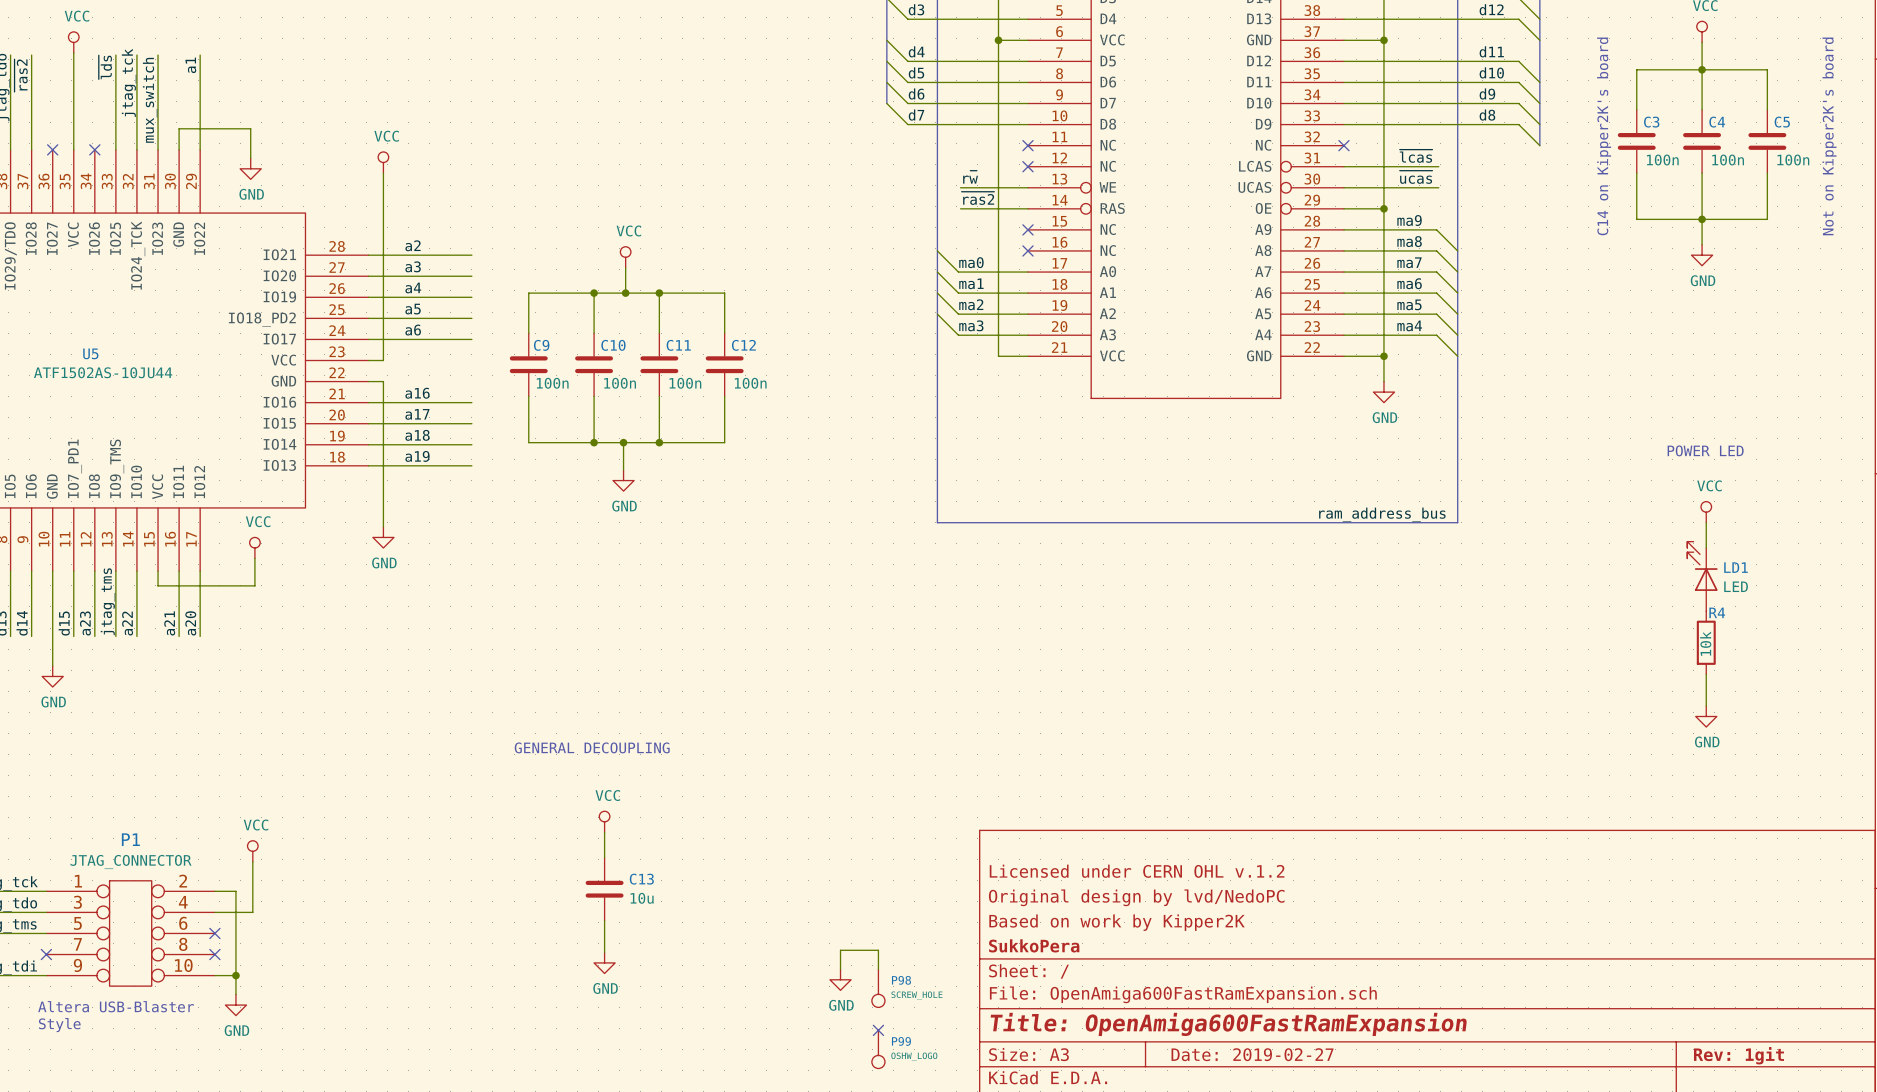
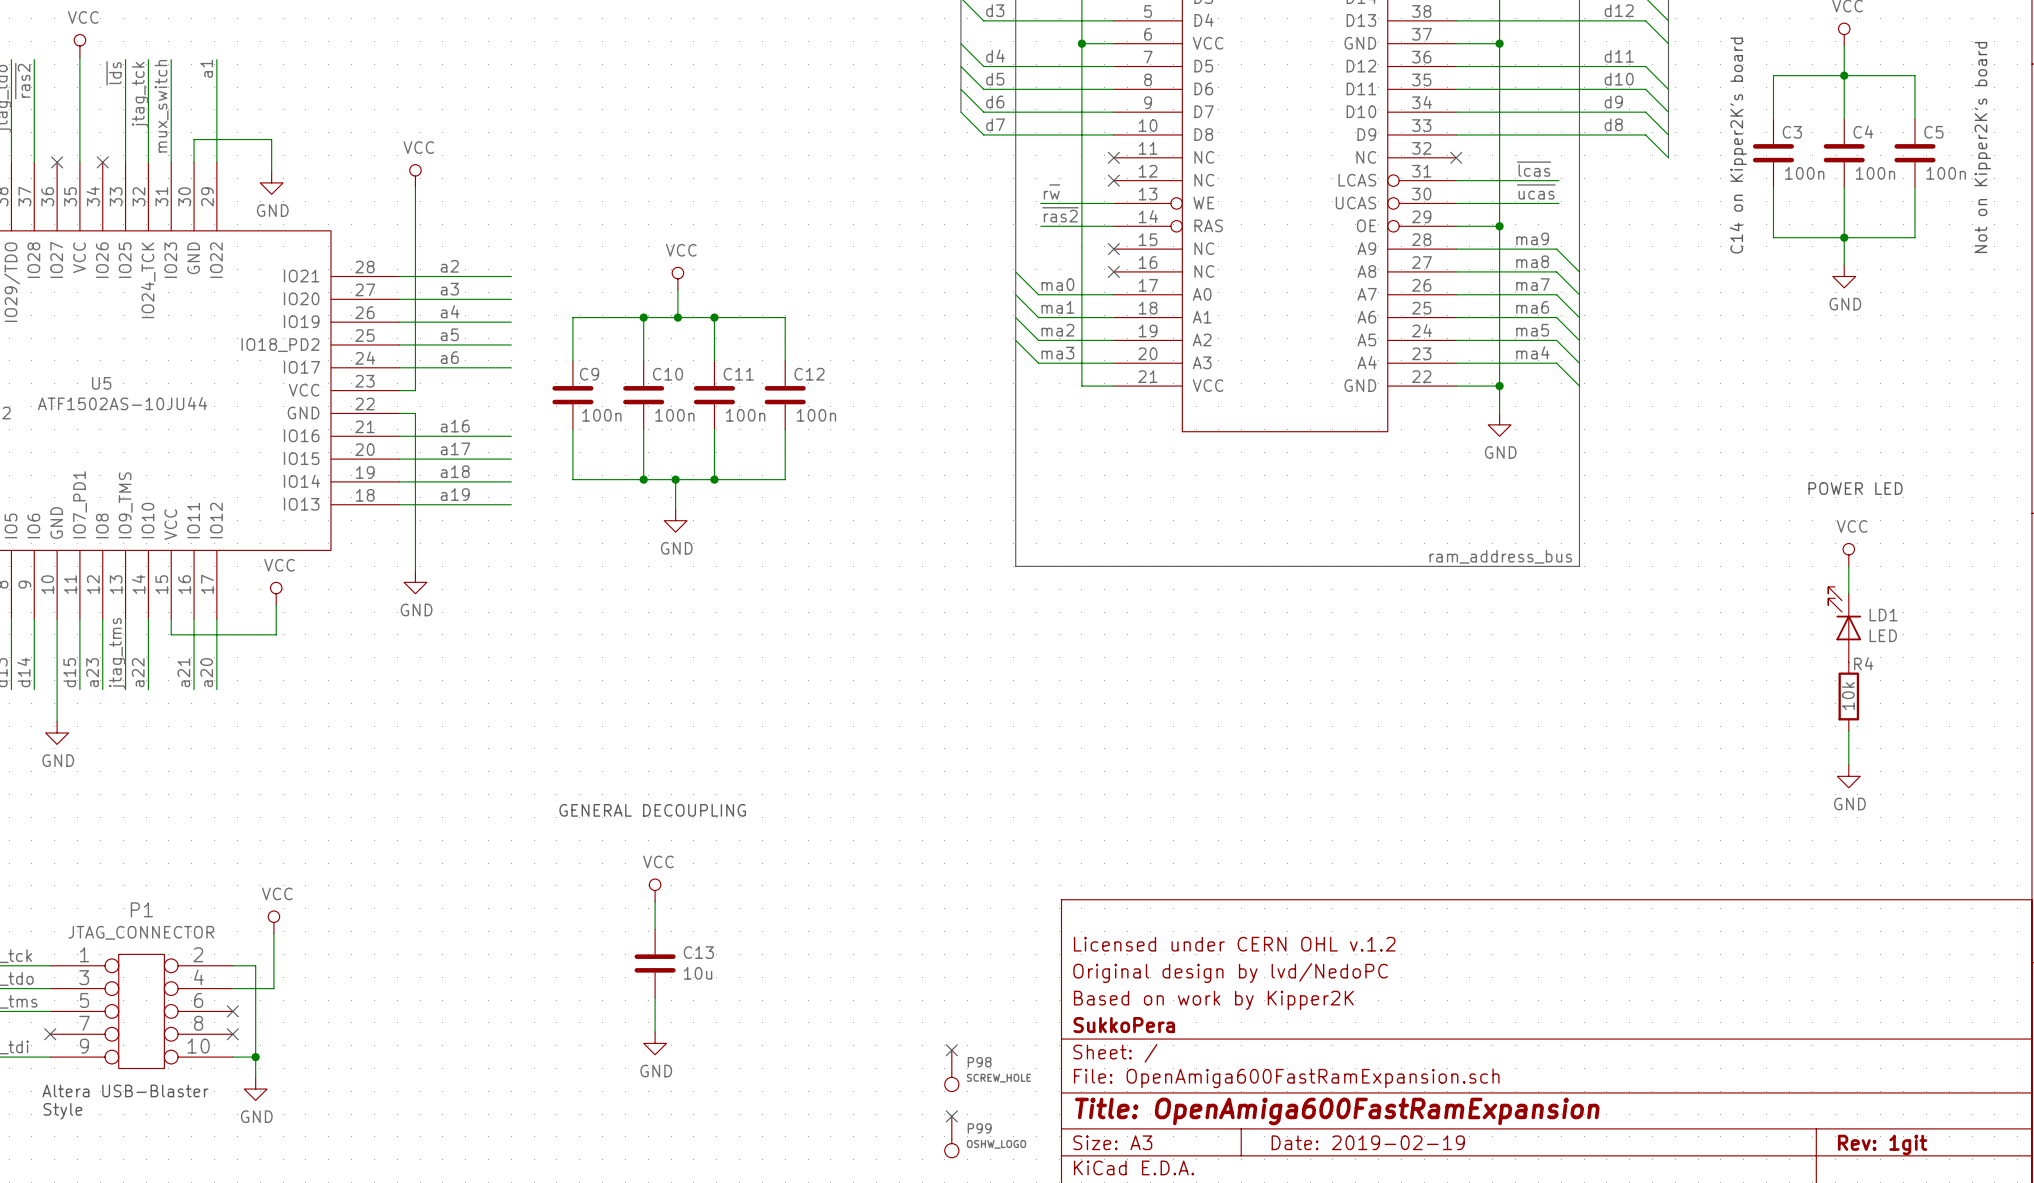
wire: (840, 969) (840, 950) (878, 950) (878, 969) -> none
no-connect mark: none -> (951, 1050)
power symbol: GND (840, 979) -> none
title block: Date: 2019-02-27 (1252, 1054) -> Date: 2019-02-19 (1368, 1142)

